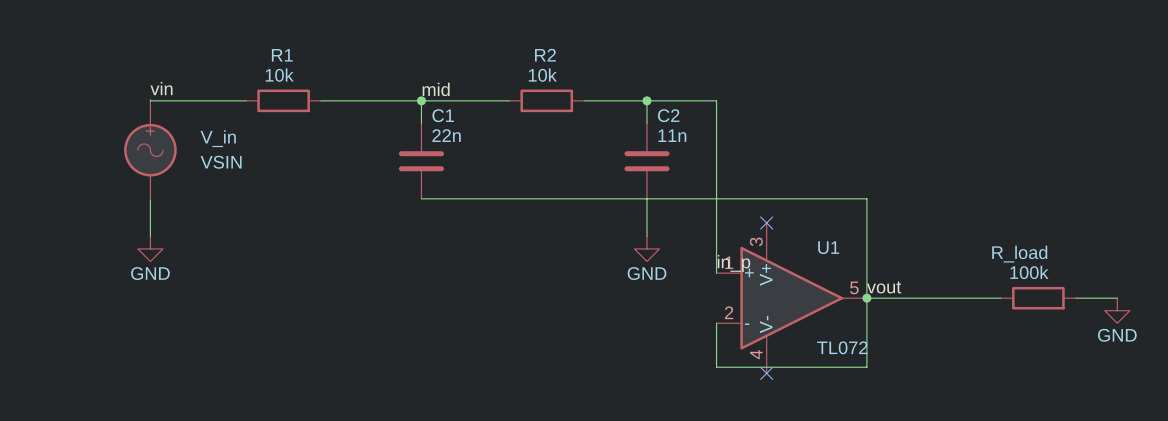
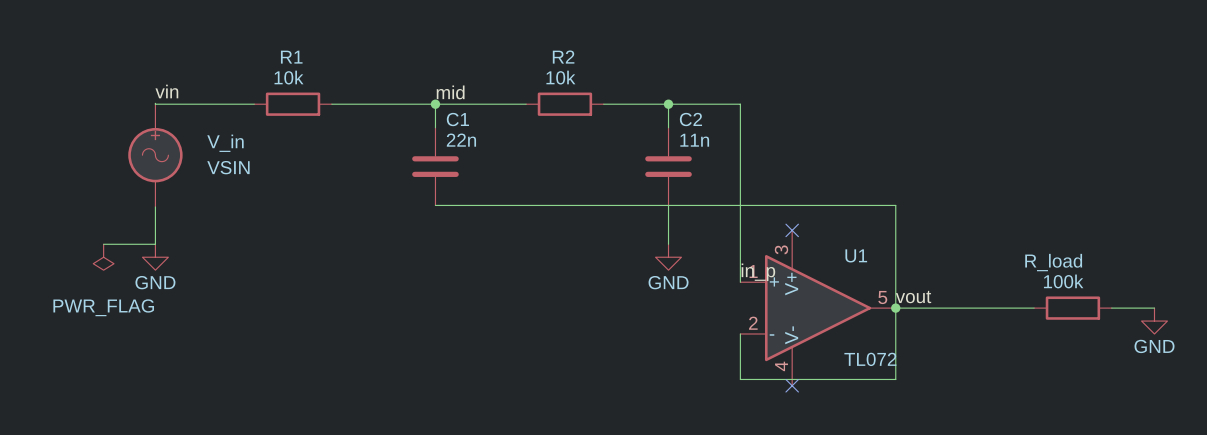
wire: none -> (103, 244) (155, 244)
power symbol: none -> PWR_FLAG (103, 257)

